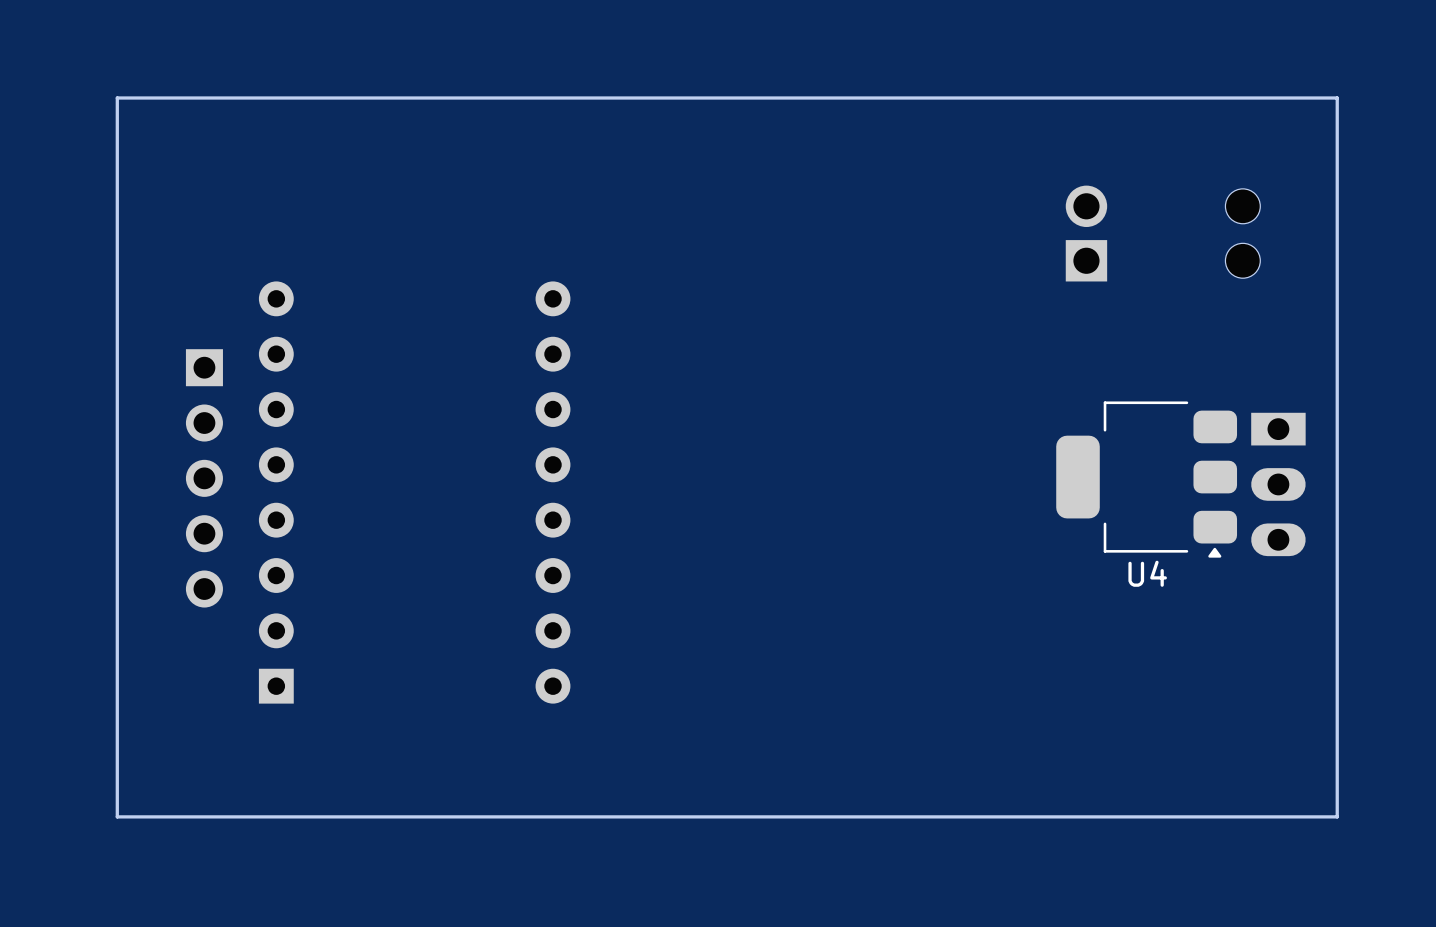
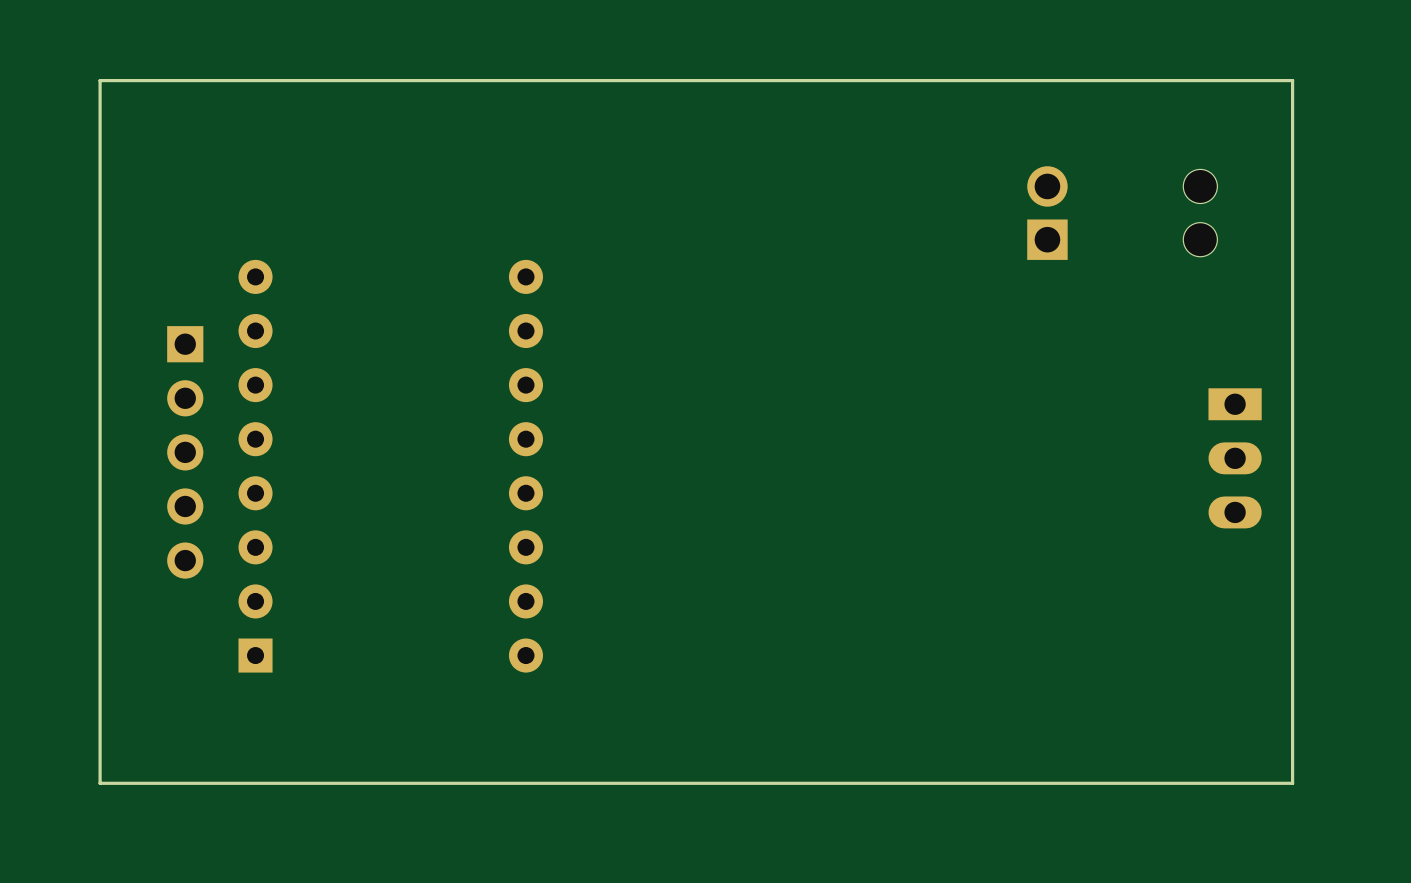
U4: (1146, 479) -> none

